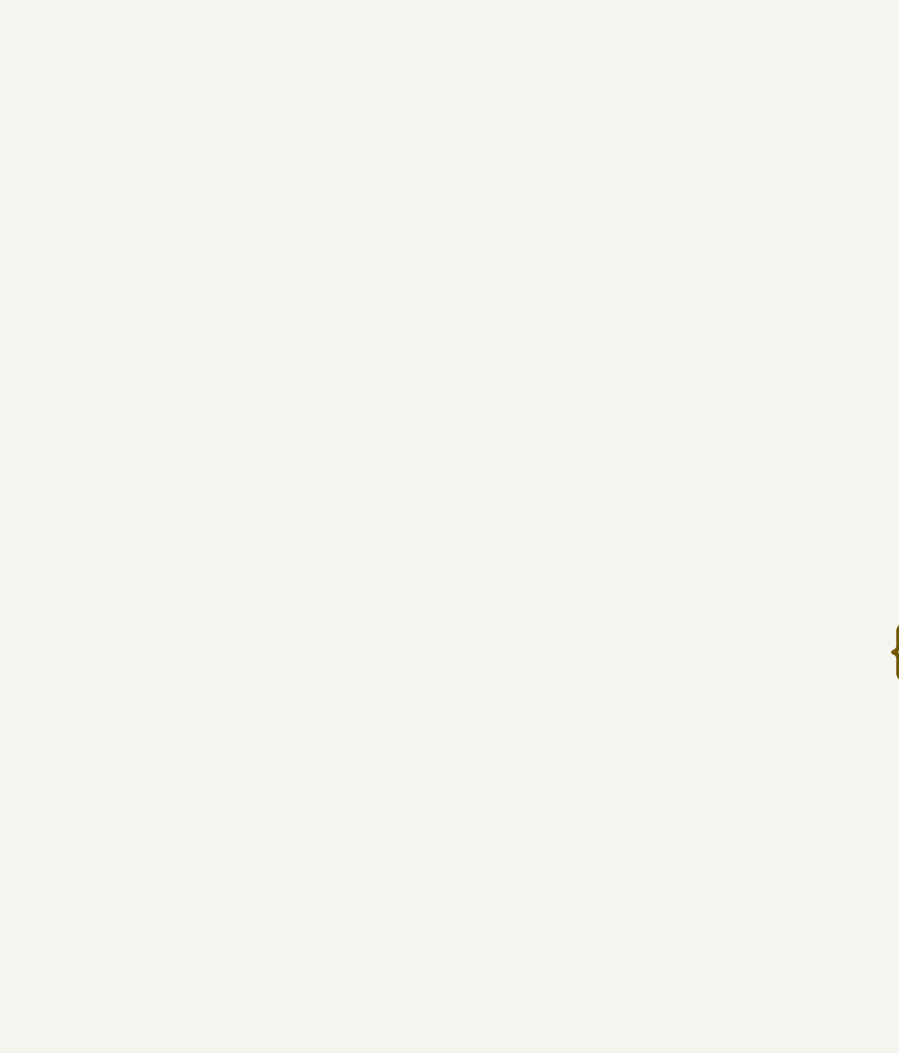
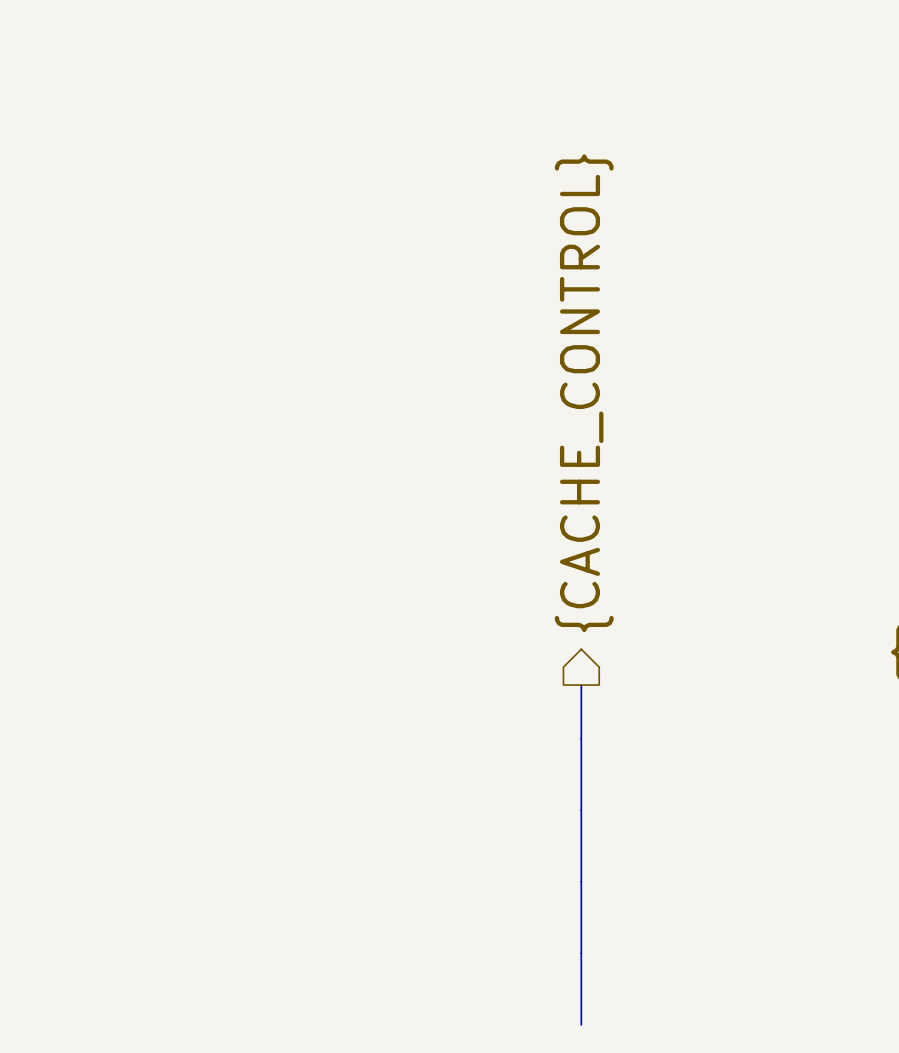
hierarchical label: none -> {CACHE_CONTROL} (584, 393)
bus: none -> (581, 685) (581, 1024)

